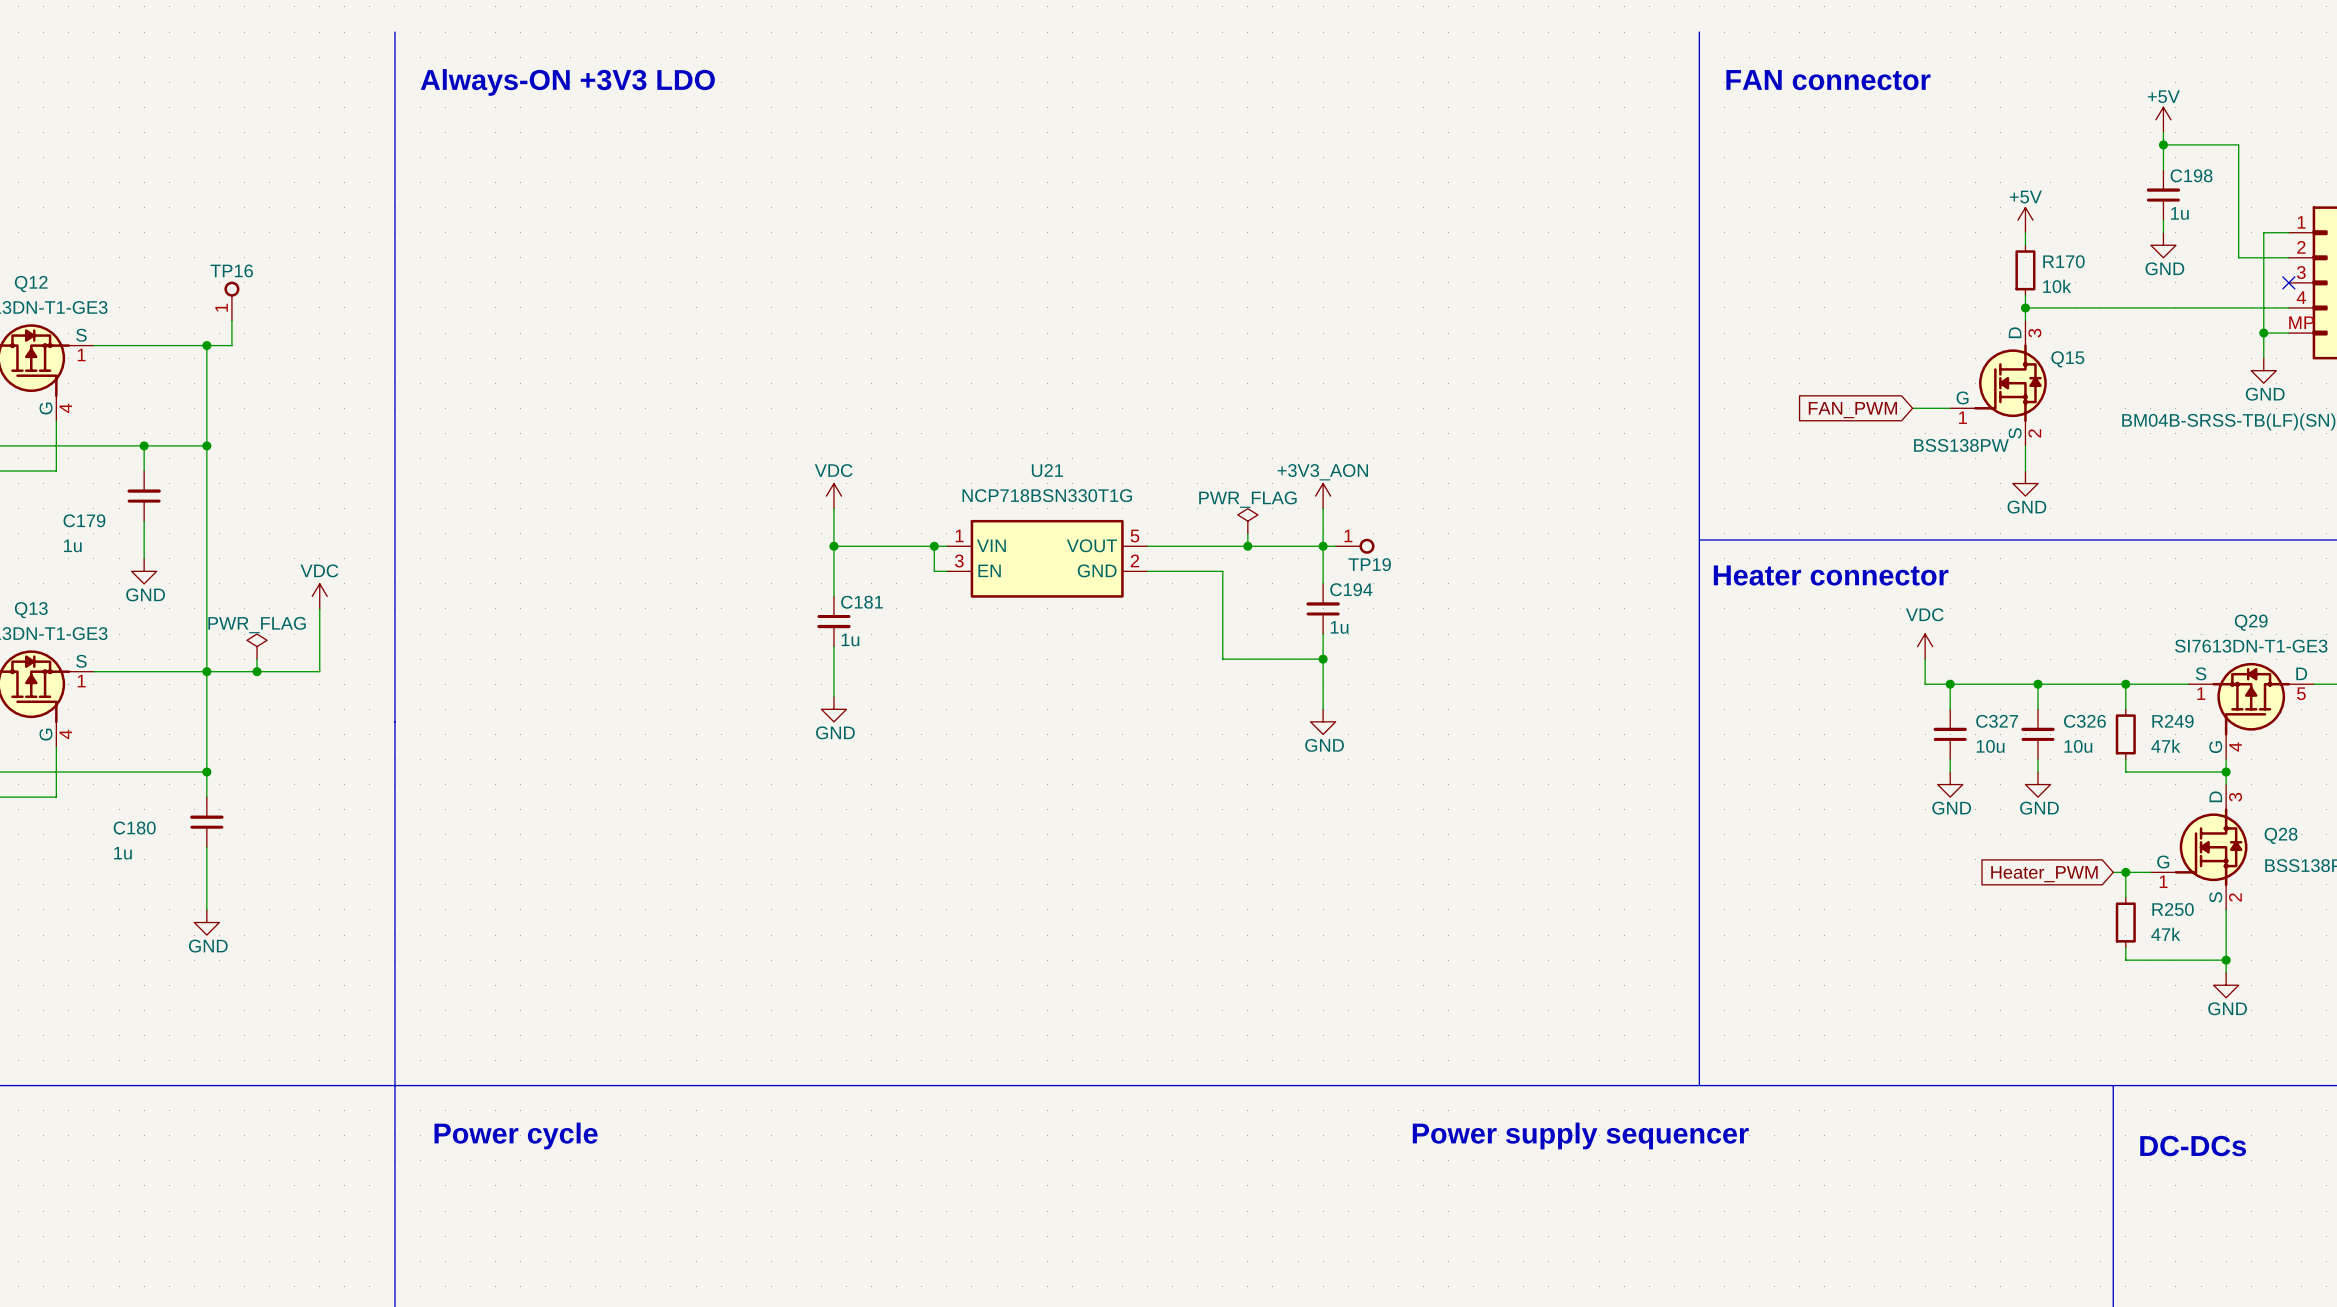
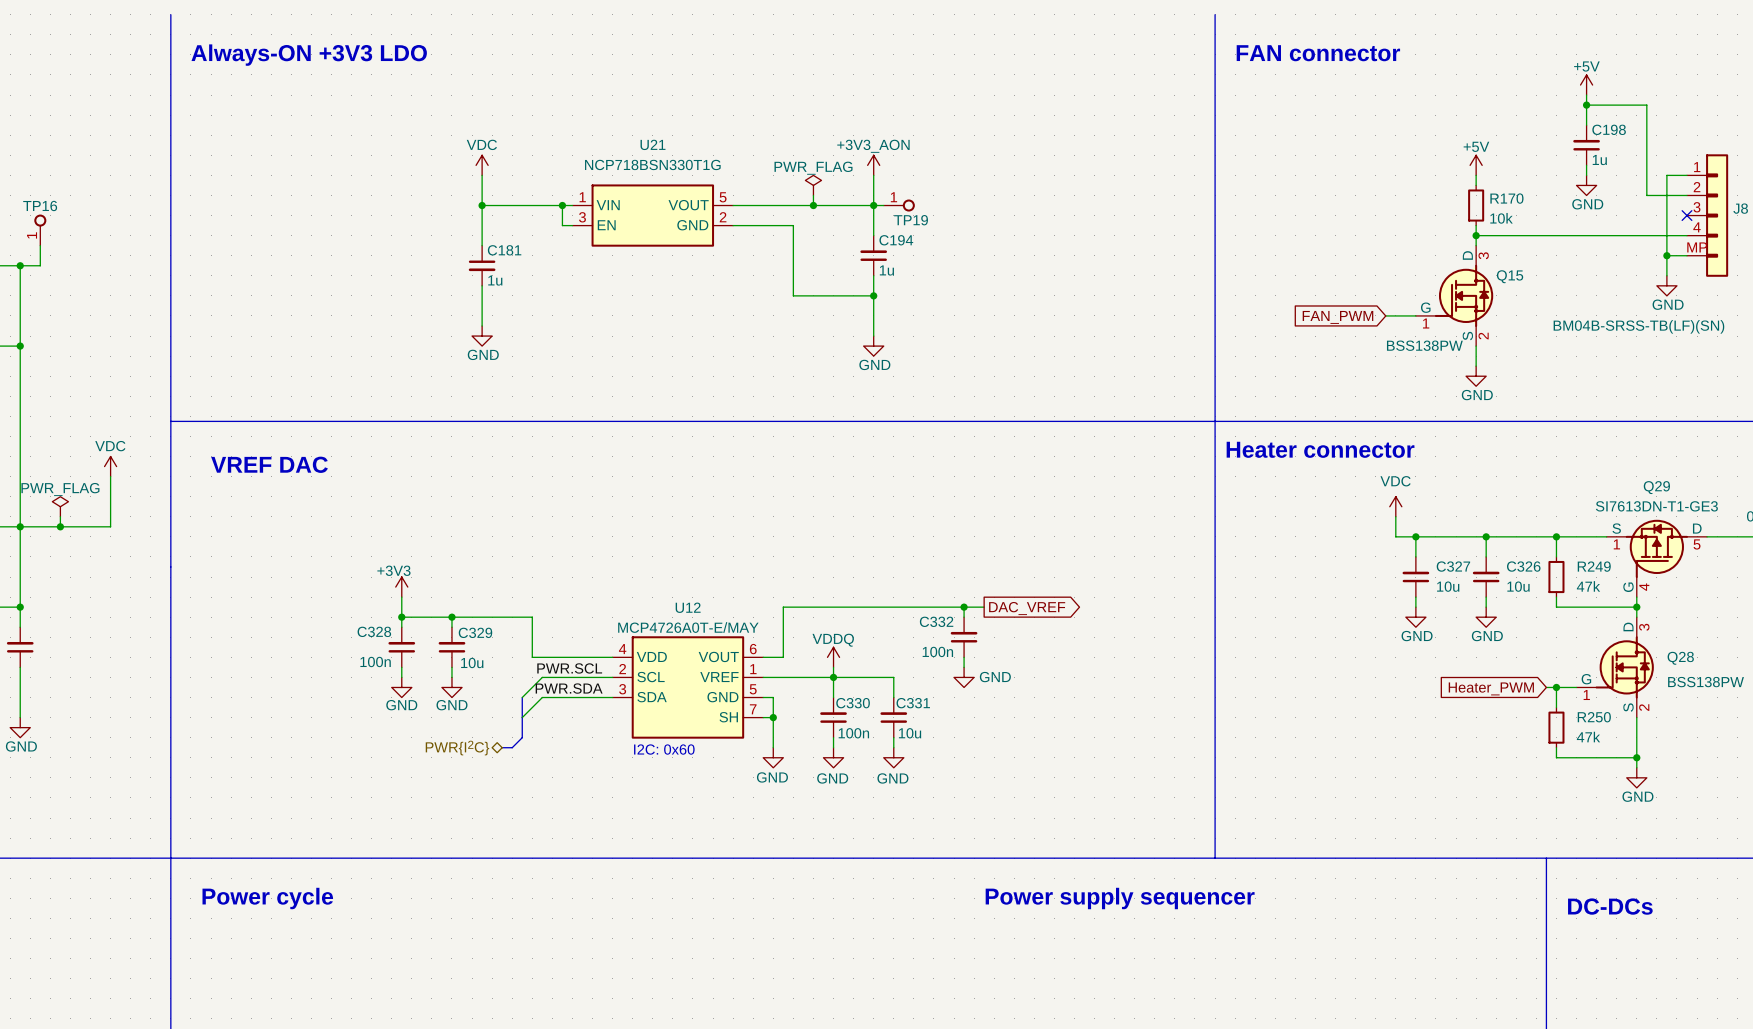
power symbol: none -> VDC (482, 165)
power symbol: none -> +3V3_AON (873, 165)
wire: none -> (482, 175) (482, 245)
wire: none -> (873, 175) (873, 235)
power symbol: none -> PWR_FLAG (813, 185)
wire: none -> (813, 195) (813, 205)
wire: none -> (482, 205) (572, 205)
junction: none -> (482, 205)
wire: none -> (562, 205) (562, 225) (572, 225)
junction: none -> (562, 205)
wire: none -> (733, 205) (883, 205)
junction: none -> (813, 205)
junction: none -> (873, 205)
wire: none -> (733, 225) (793, 225) (793, 295) (873, 295)
wire: none -> (482, 285) (482, 326)
junction: none -> (873, 295)
power symbol: none -> GND (482, 336)
power symbol: none -> GND (873, 346)
power symbol: VDC (833, 496) -> none
power symbol: +3V3_AON (1323, 496) -> none
wire: (833, 508) (833, 596) -> none
wire: (1323, 508) (1323, 583) -> (873, 275) (873, 336)
power symbol: PWR_FLAG (1247, 521) -> none
wire: (1247, 533) (1247, 546) -> none
line: none -> (170, 421) (1215, 421)
wire: (833, 546) (946, 546) -> none
junction: (833, 546) -> none
wire: (934, 546) (934, 571) (946, 571) -> none
junction: (934, 546) -> none
wire: (1147, 546) (1335, 546) -> none
junction: (1247, 546) -> none
junction: (1323, 546) -> none
TP19 position: (1355, 546) -> (899, 205)
U21 position: (1047, 558) -> (652, 215)
wire: (1147, 571) (1222, 571) (1222, 659) (1323, 659) -> none
text: none -> VREF DAC (269, 464)
C194 position: (1323, 608) -> (873, 255)
C181 position: (833, 621) -> (482, 265)
wire: (1323, 634) (1323, 709) -> none
wire: (833, 646) (833, 696) -> none
junction: (1323, 659) -> none
power symbol: GND (833, 709) -> none
power symbol: GND (1323, 721) -> none
power symbol: none -> +3V3 (401, 587)
wire: none -> (401, 597) (401, 627)
wire: none -> (964, 607) (964, 617)
junction: none -> (964, 607)
wire: none -> (984, 607) (783, 607) (783, 657) (763, 657)
global label: none -> DAC_VREF (1027, 608)
wire: none -> (401, 617) (532, 617) (532, 657) (612, 657)
junction: none -> (401, 617)
wire: none -> (451, 617) (451, 627)
junction: none -> (451, 617)
C332: none -> (964, 637)
C328: none -> (401, 647)
C329: none -> (451, 647)
power symbol: none -> VDDQ (833, 657)
wire: none -> (964, 657) (964, 667)
wire: none -> (401, 667) (401, 677)
wire: none -> (451, 667) (451, 677)
wire: none -> (833, 667) (833, 697)
label: none -> PWR.SCL (569, 668)
wire: none -> (612, 677) (542, 677) (522, 697)
wire: none -> (763, 677) (893, 677) (893, 697)
junction: none -> (833, 677)
power symbol: none -> GND (964, 677)
power symbol: none -> GND (401, 687)
power symbol: none -> GND (451, 687)
U12: none -> (687, 687)
label: none -> PWR.SDA (569, 688)
bus: none -> (522, 697) (522, 737) (512, 747) (502, 747)
wire: none -> (612, 697) (542, 697) (522, 717)
wire: none -> (763, 697) (773, 697) (773, 747)
wire: none -> (763, 717) (773, 717)
junction: none -> (773, 717)
C330: none -> (833, 717)
C331: none -> (893, 717)
wire: none -> (833, 737) (833, 747)
wire: none -> (893, 737) (893, 747)
hierarchical label: none -> PWR{I2C} (457, 748)
text: none -> I2C: 0x60 (664, 749)
power symbol: none -> GND (773, 757)
power symbol: none -> GND (833, 757)
power symbol: none -> GND (893, 757)

